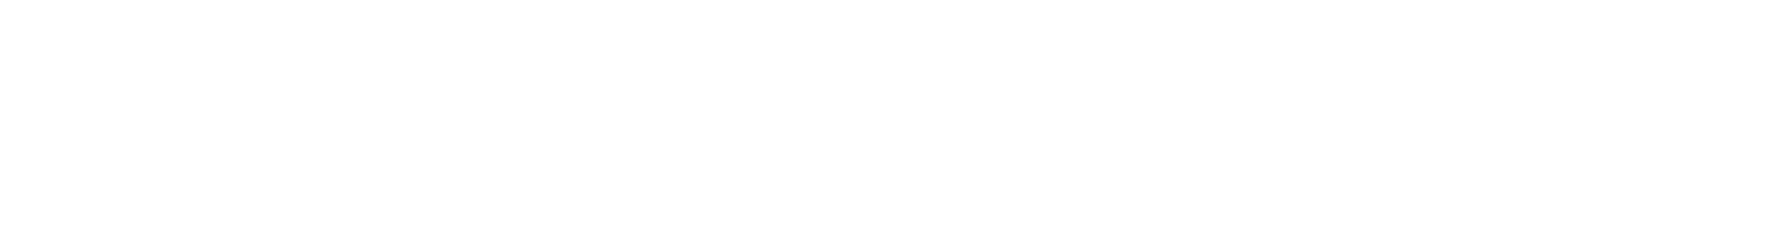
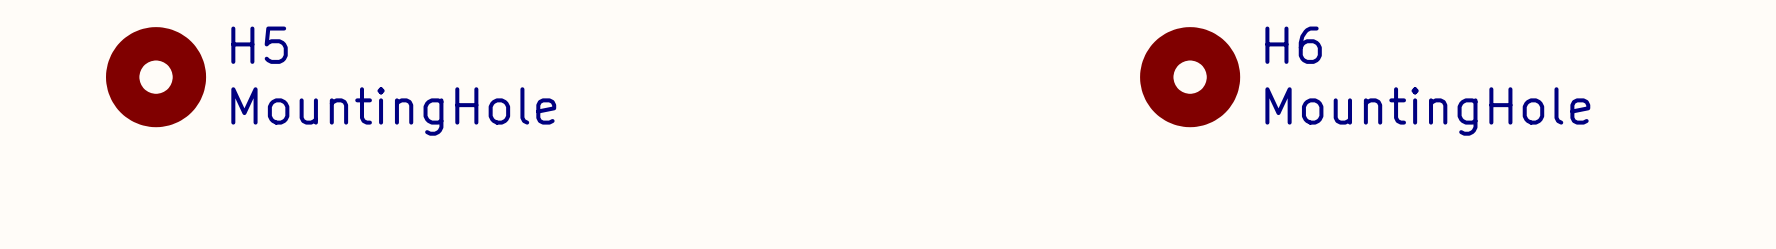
H5: none -> MountingHole (156, 77)
H6: none -> MountingHole (1190, 77)

